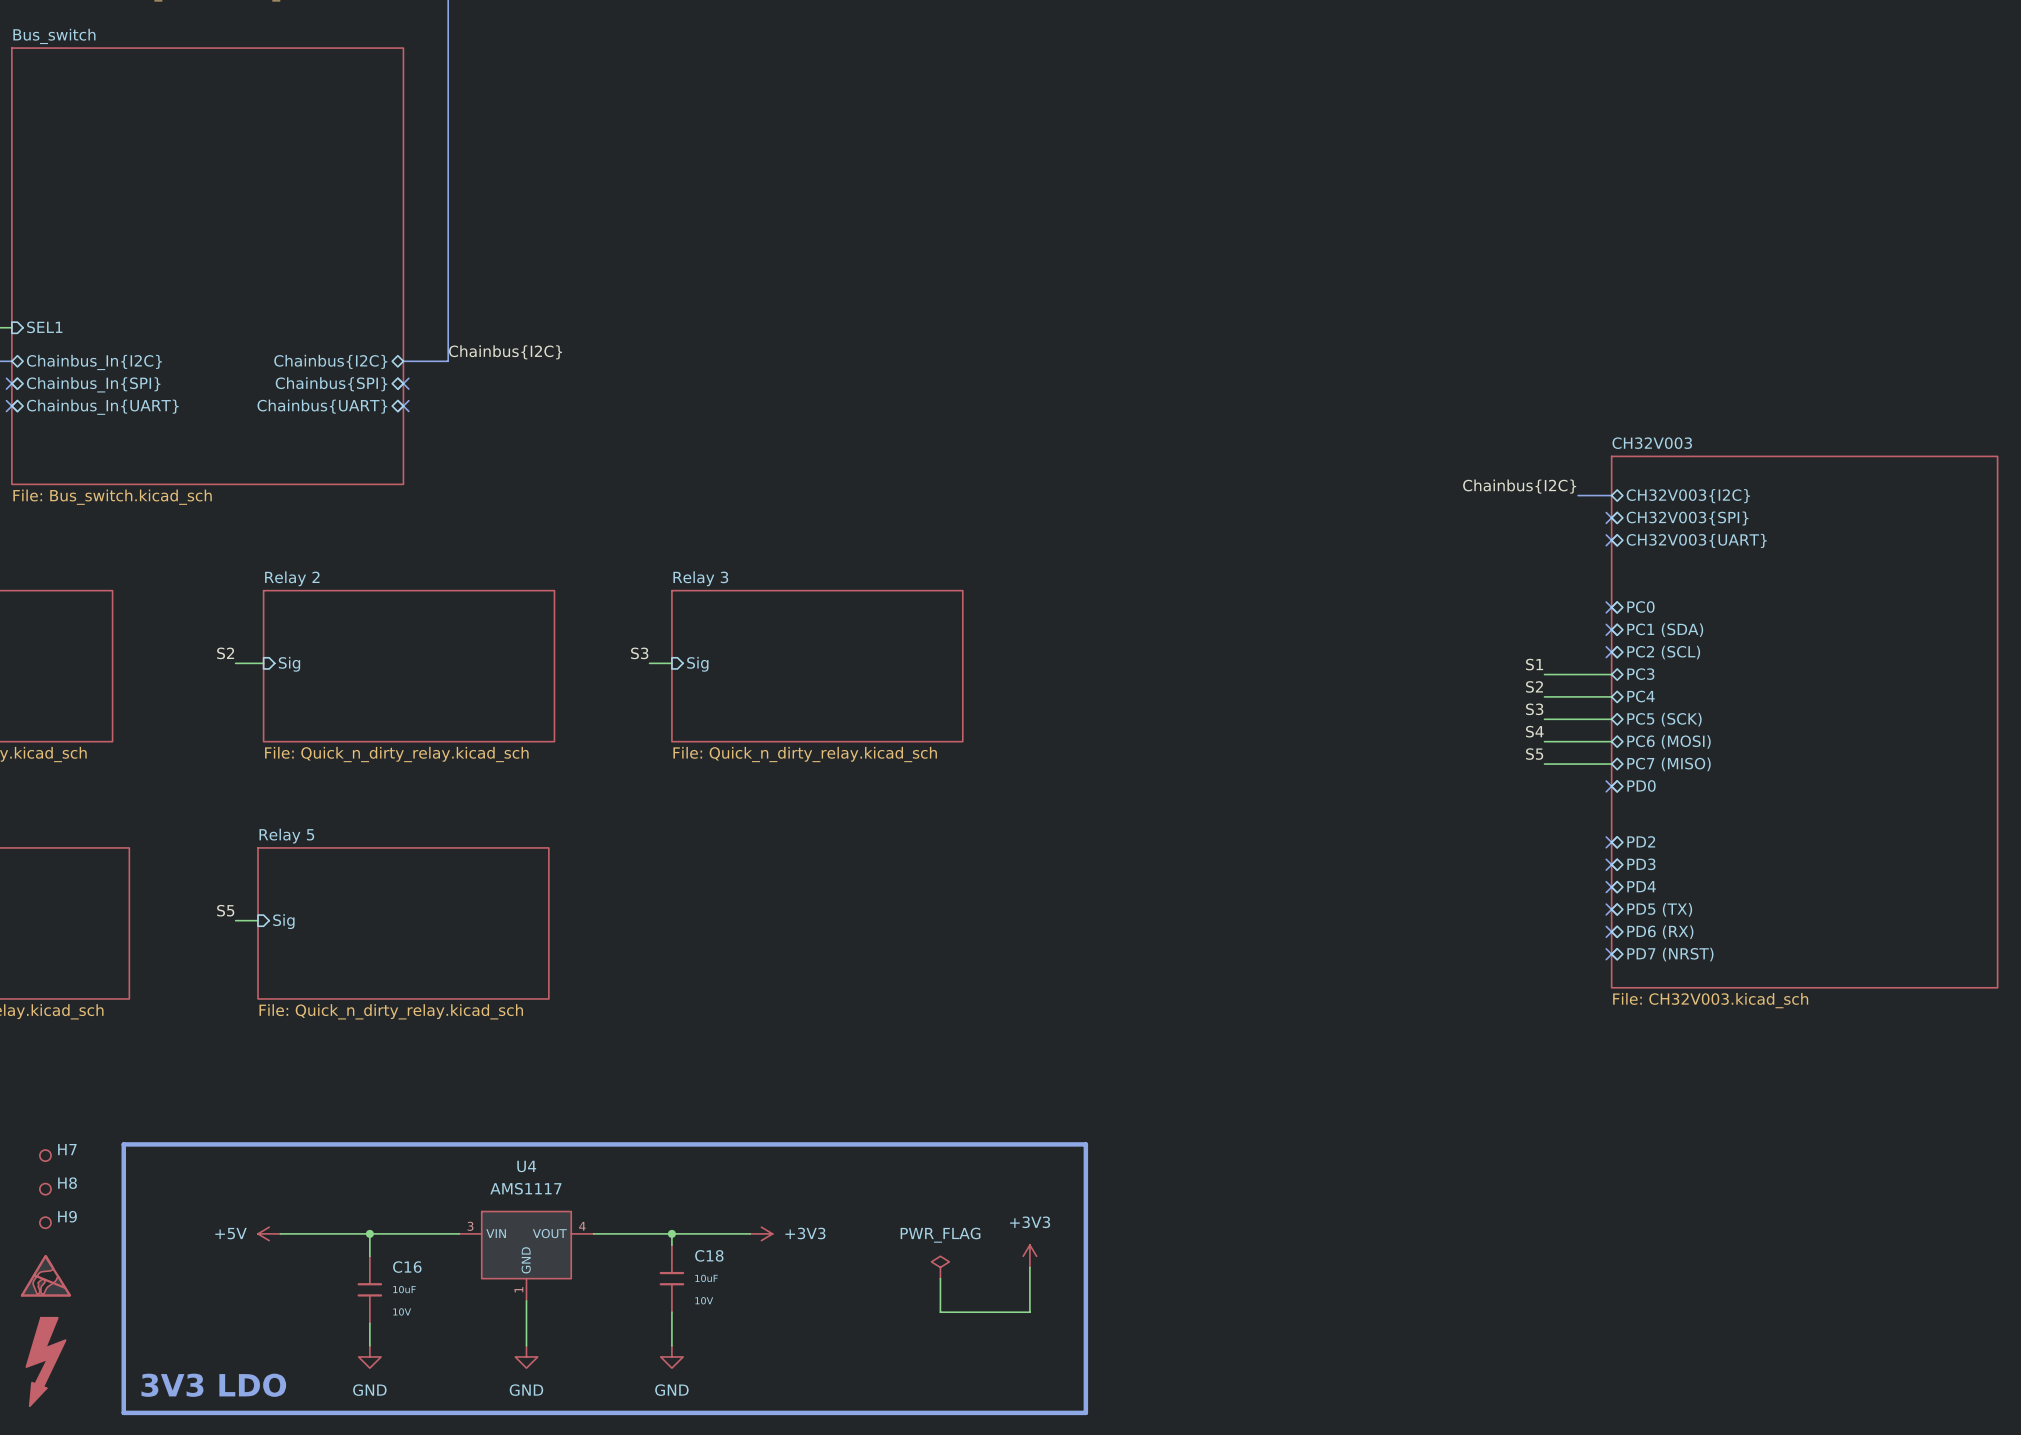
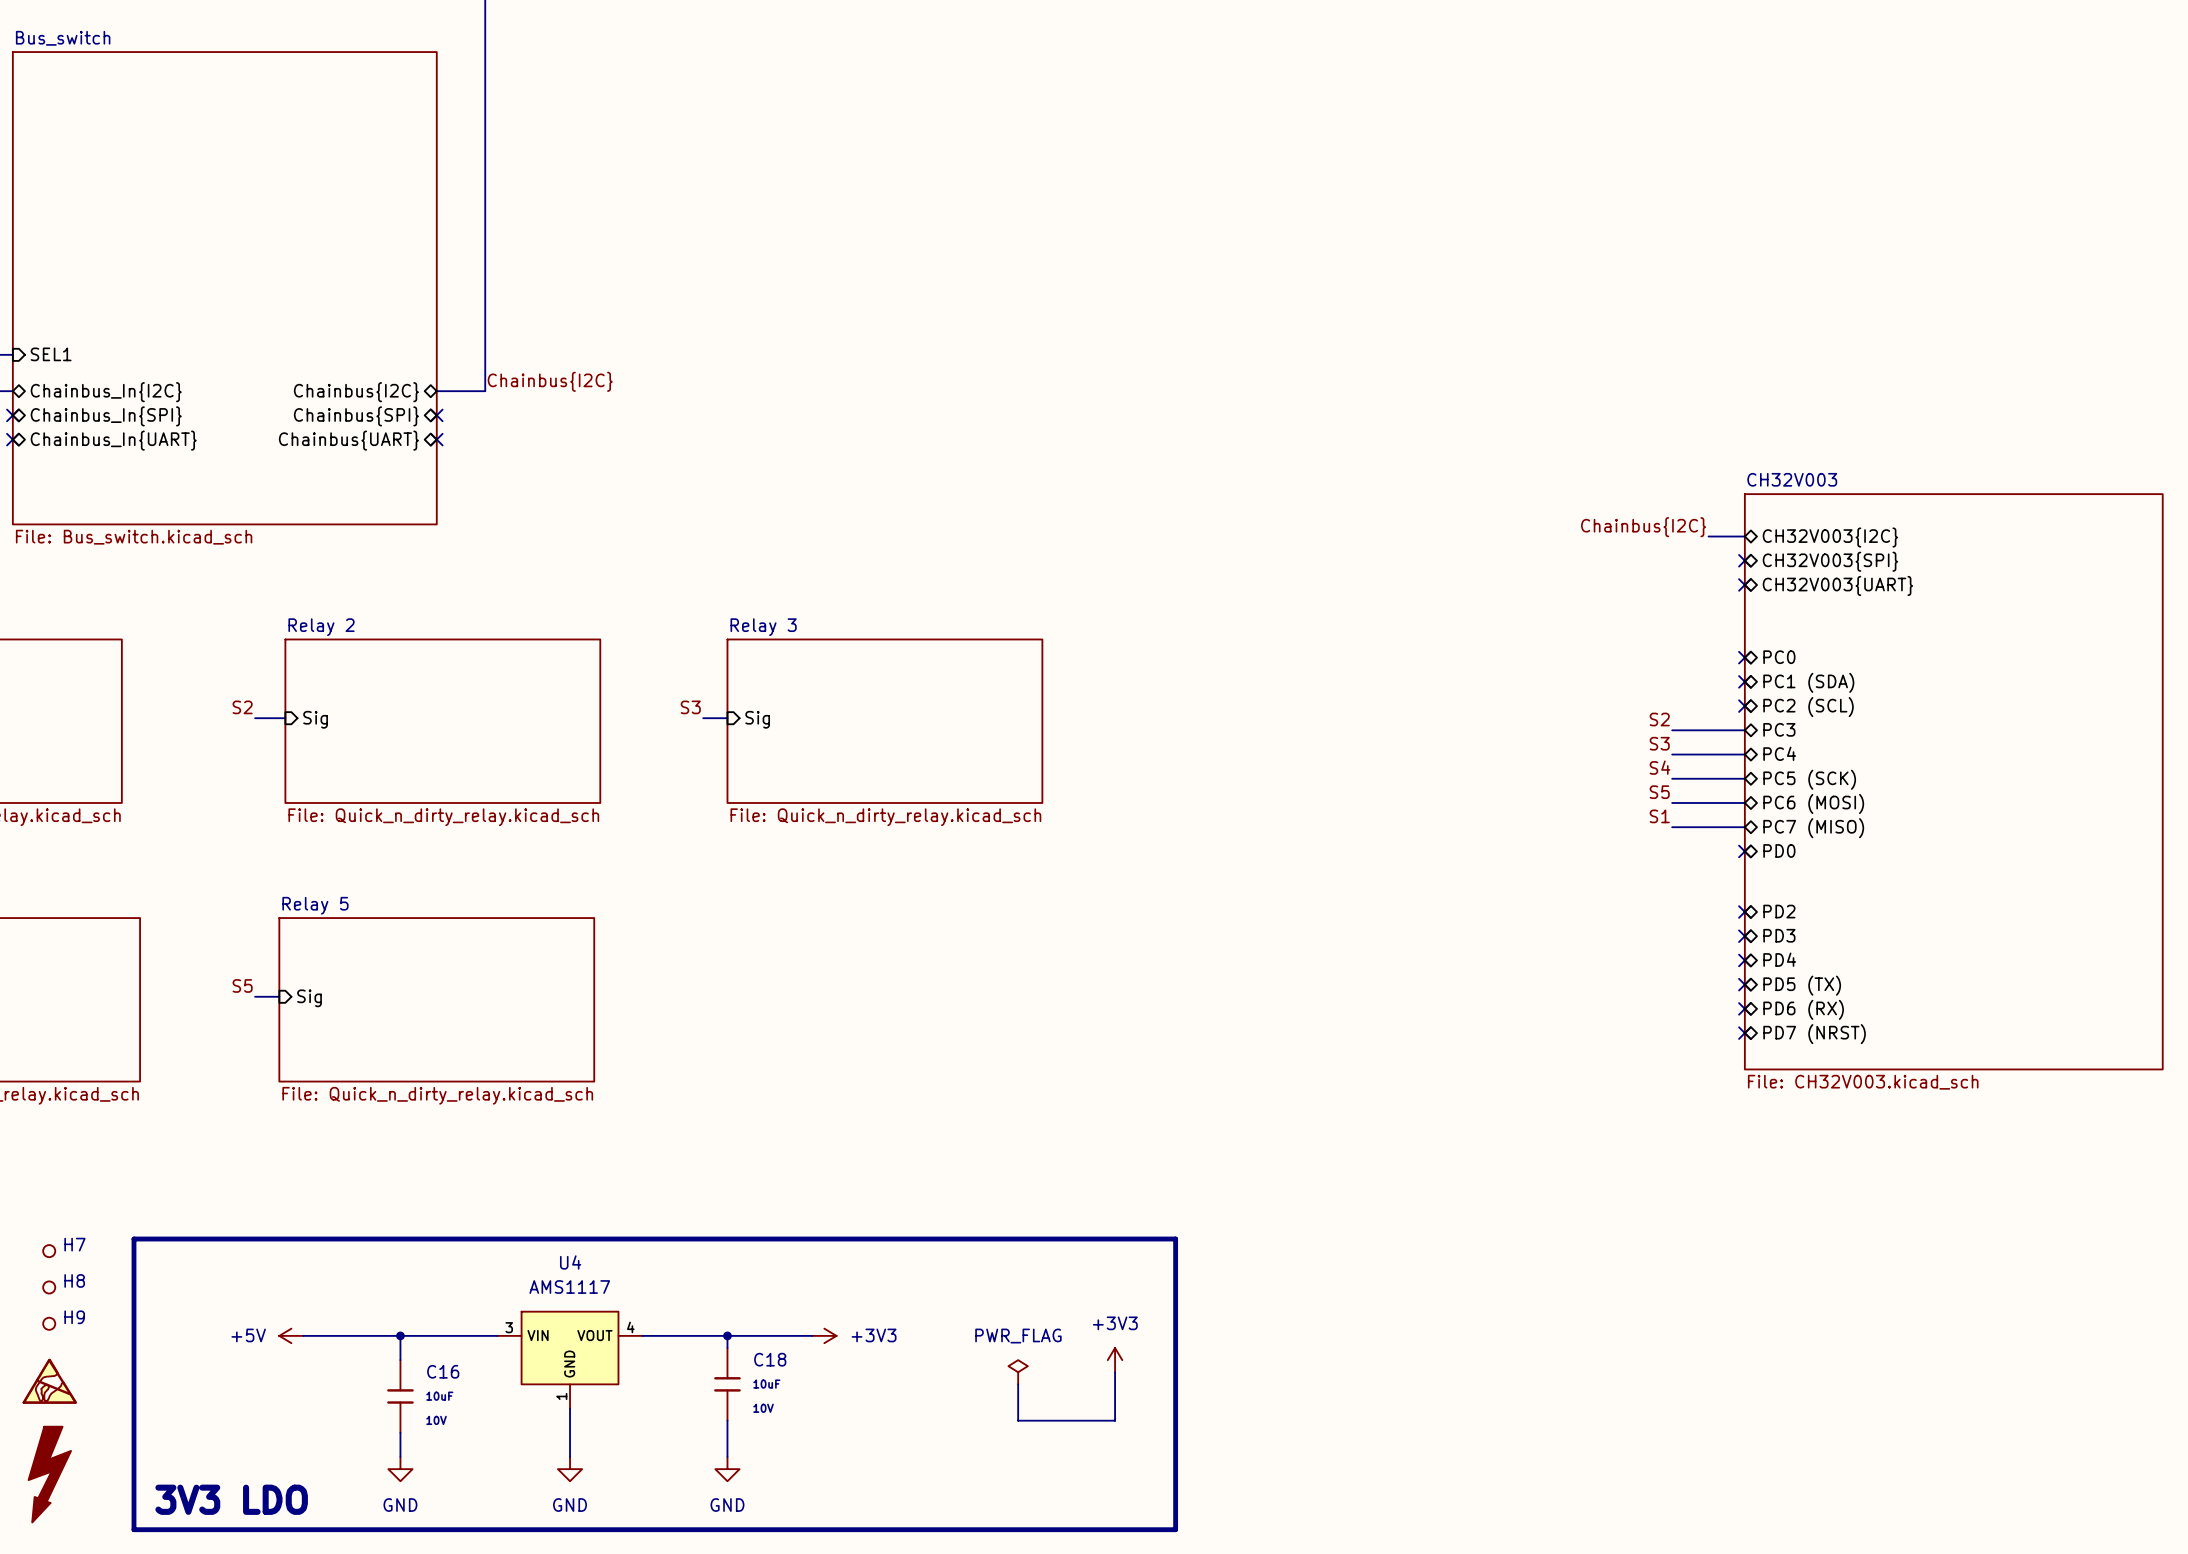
label: S1 (1534, 664) -> S2 (1659, 719)
label: S2 (1534, 686) -> S3 (1659, 743)
label: S3 (1534, 709) -> S4 (1660, 767)
label: S4 (1534, 731) -> S5 (1659, 792)
label: S5 (1534, 754) -> S1 (1659, 816)

